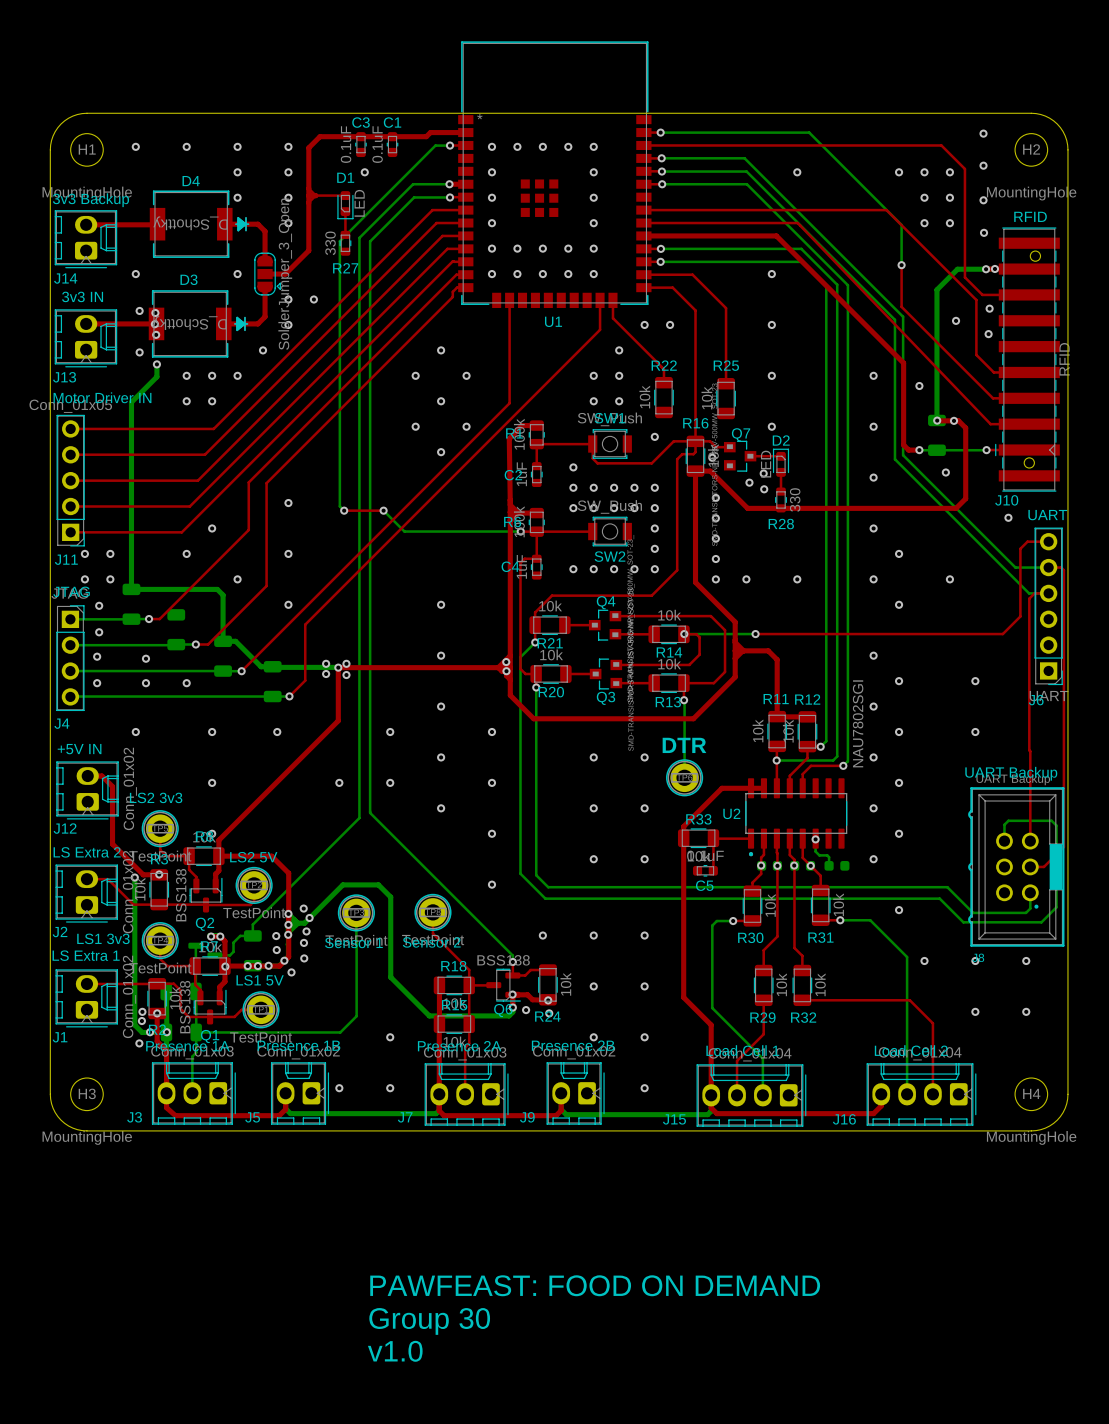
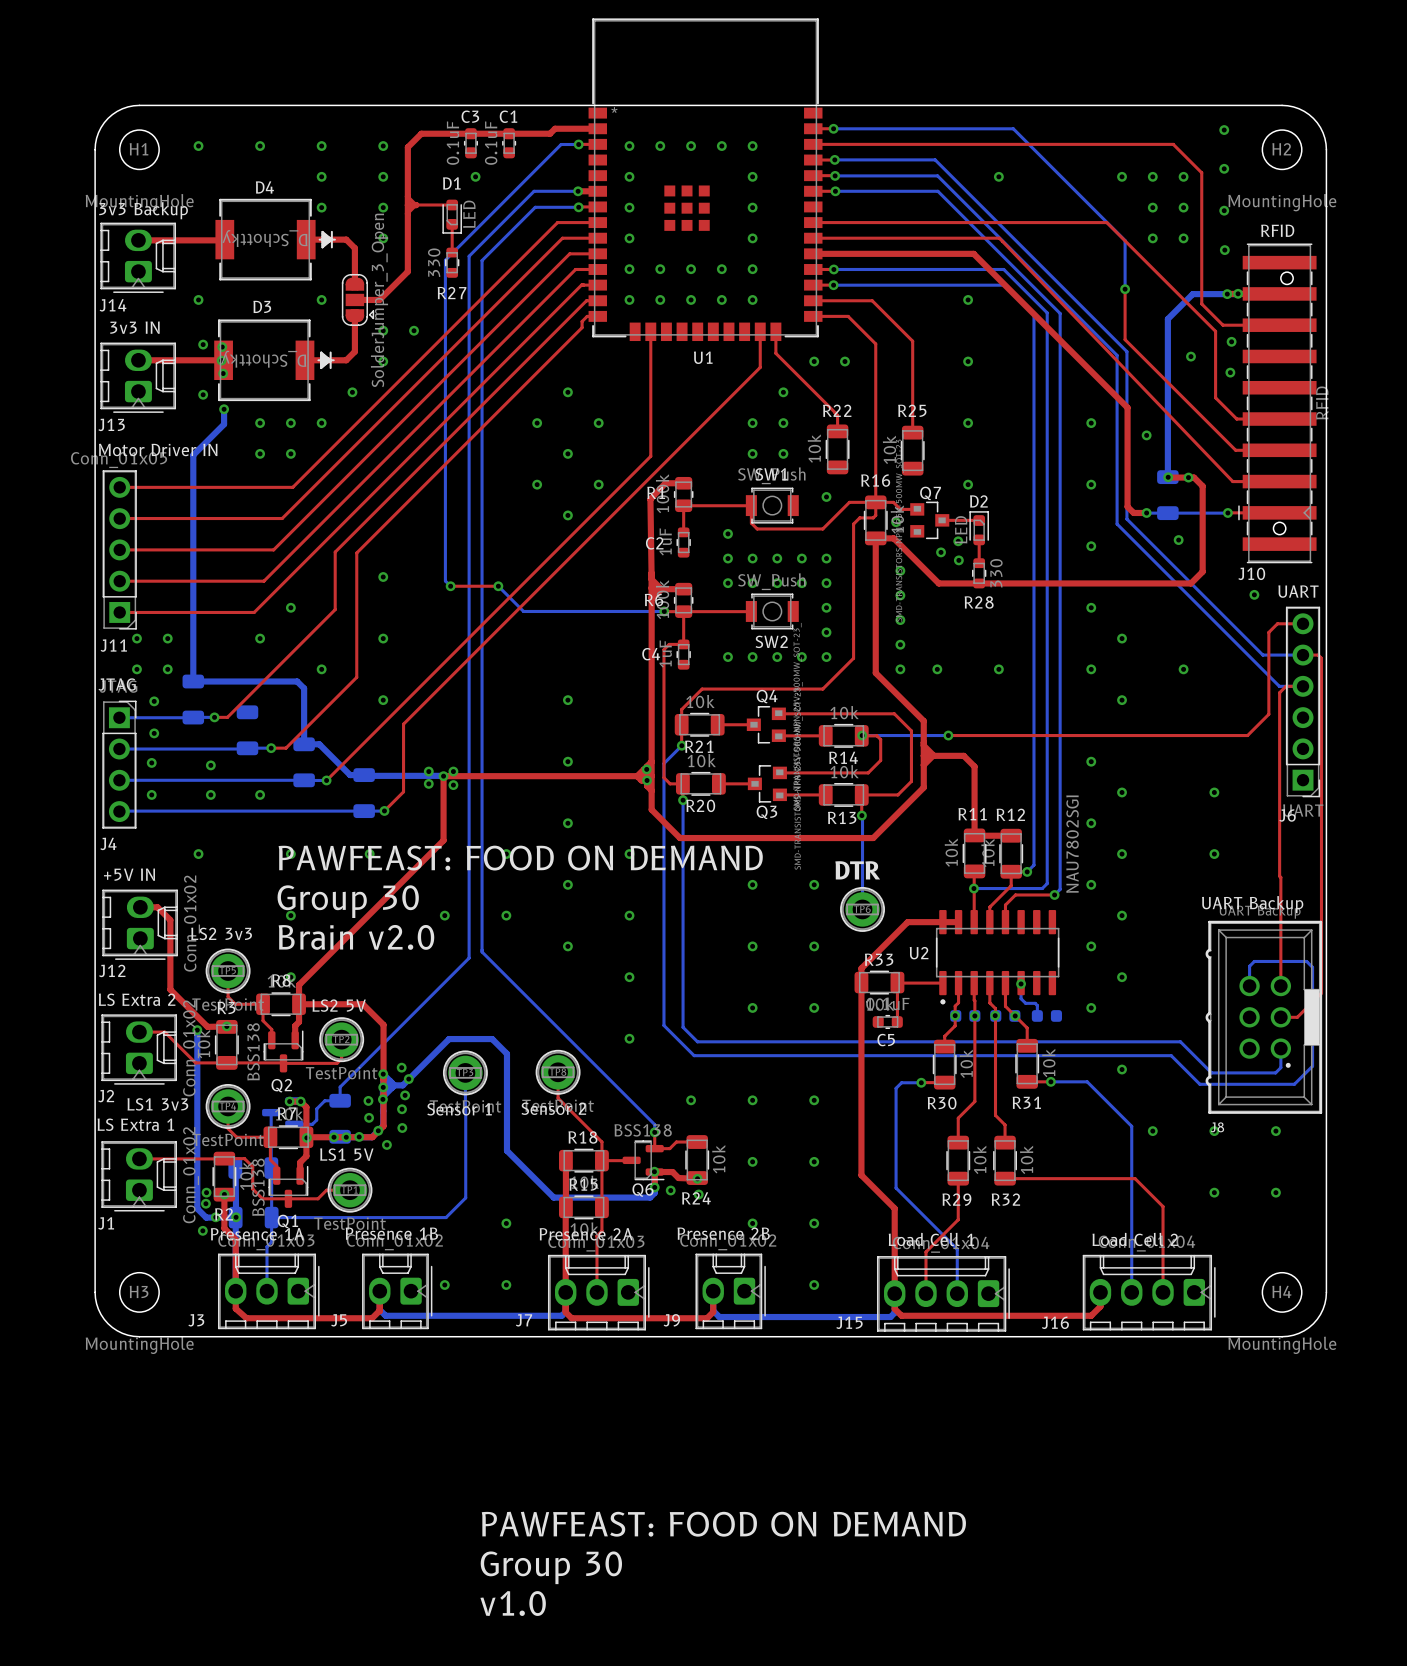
text: none -> PAWFEAST: FOOD ON DEMAND (520, 858)
text: none -> Group 30 (348, 901)
text: none -> Brain v2.0 (356, 937)

